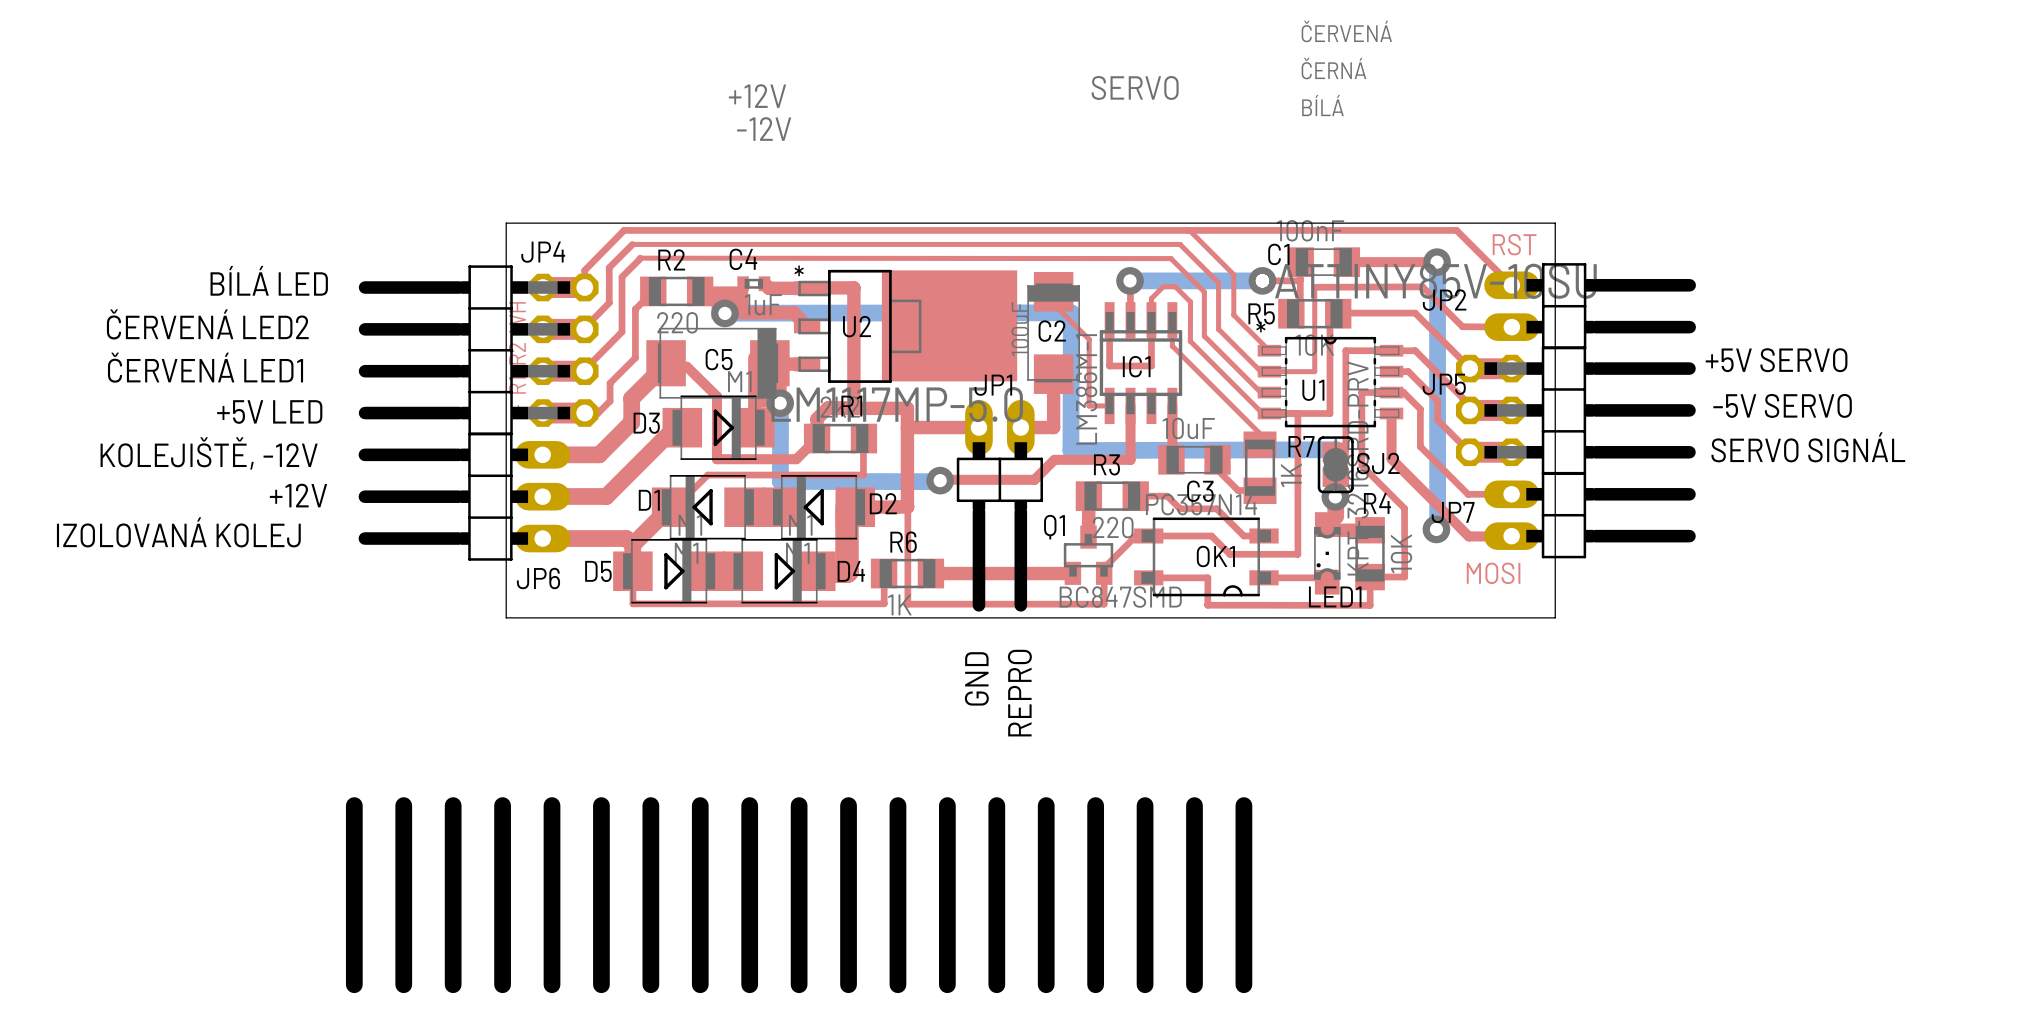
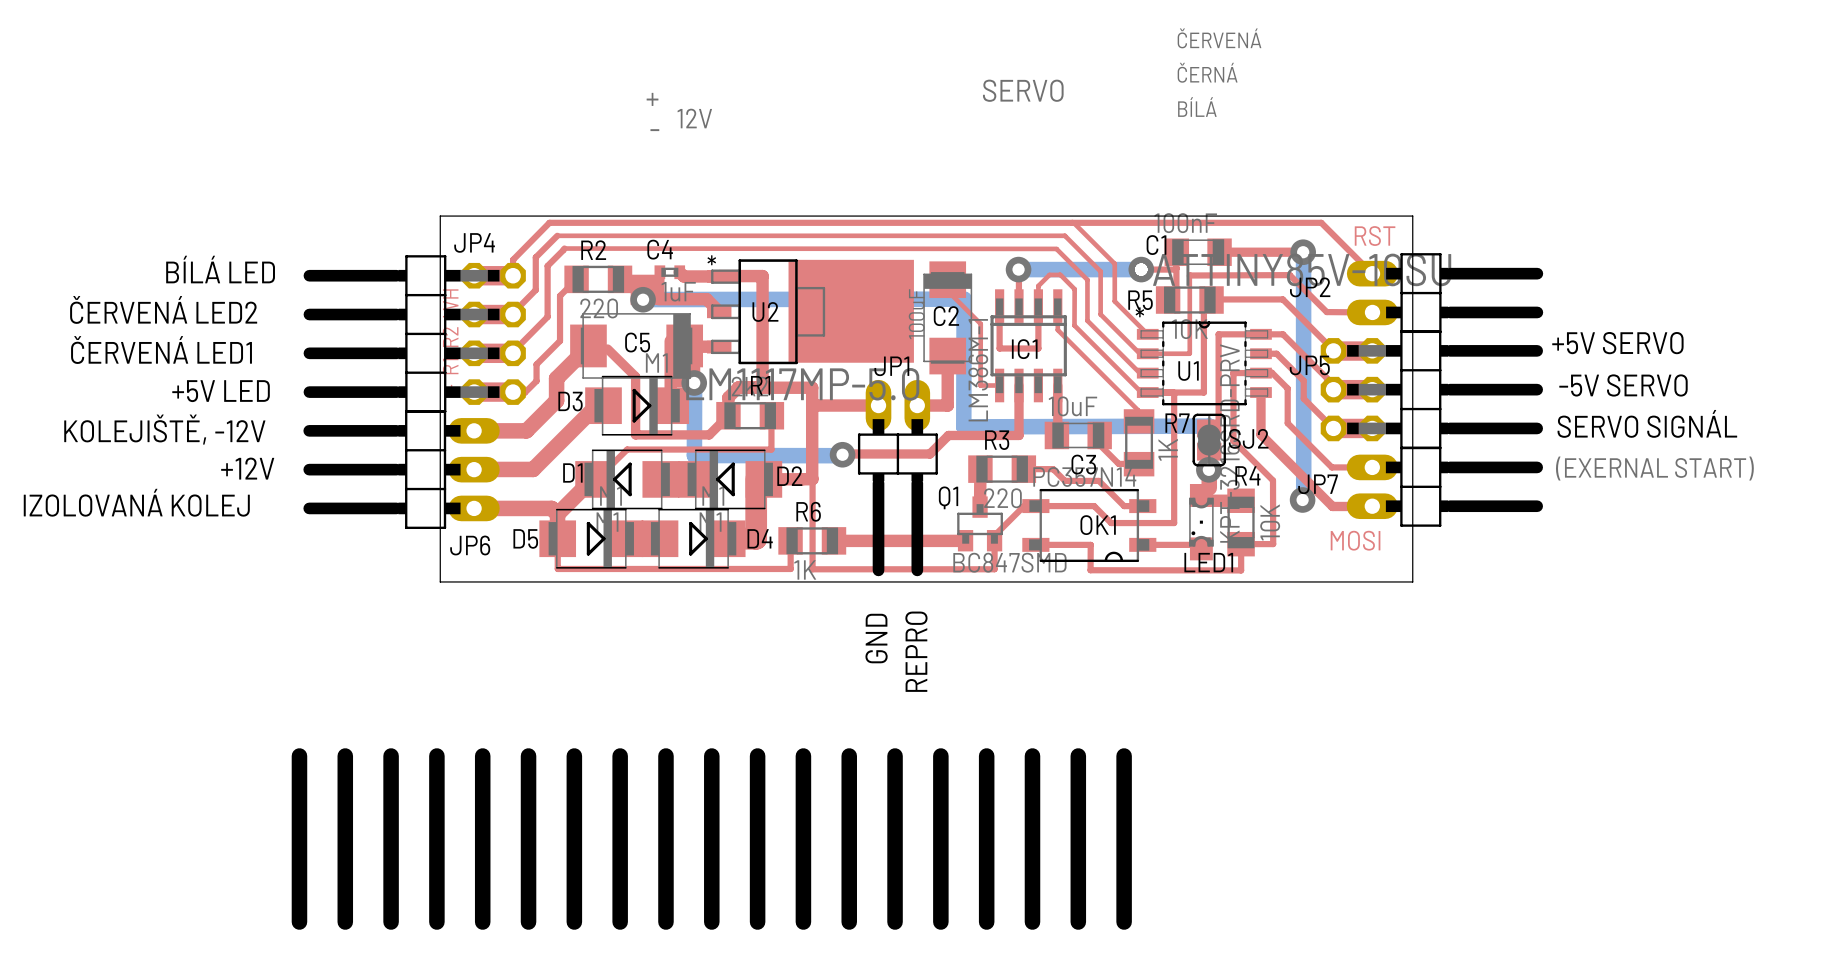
text: +12V (757, 96) -> + (652, 99)
text: none -> 12V (694, 118)
text: -12V (764, 129) -> - (654, 130)
text: none -> (EXERNAL START) (1654, 468)

